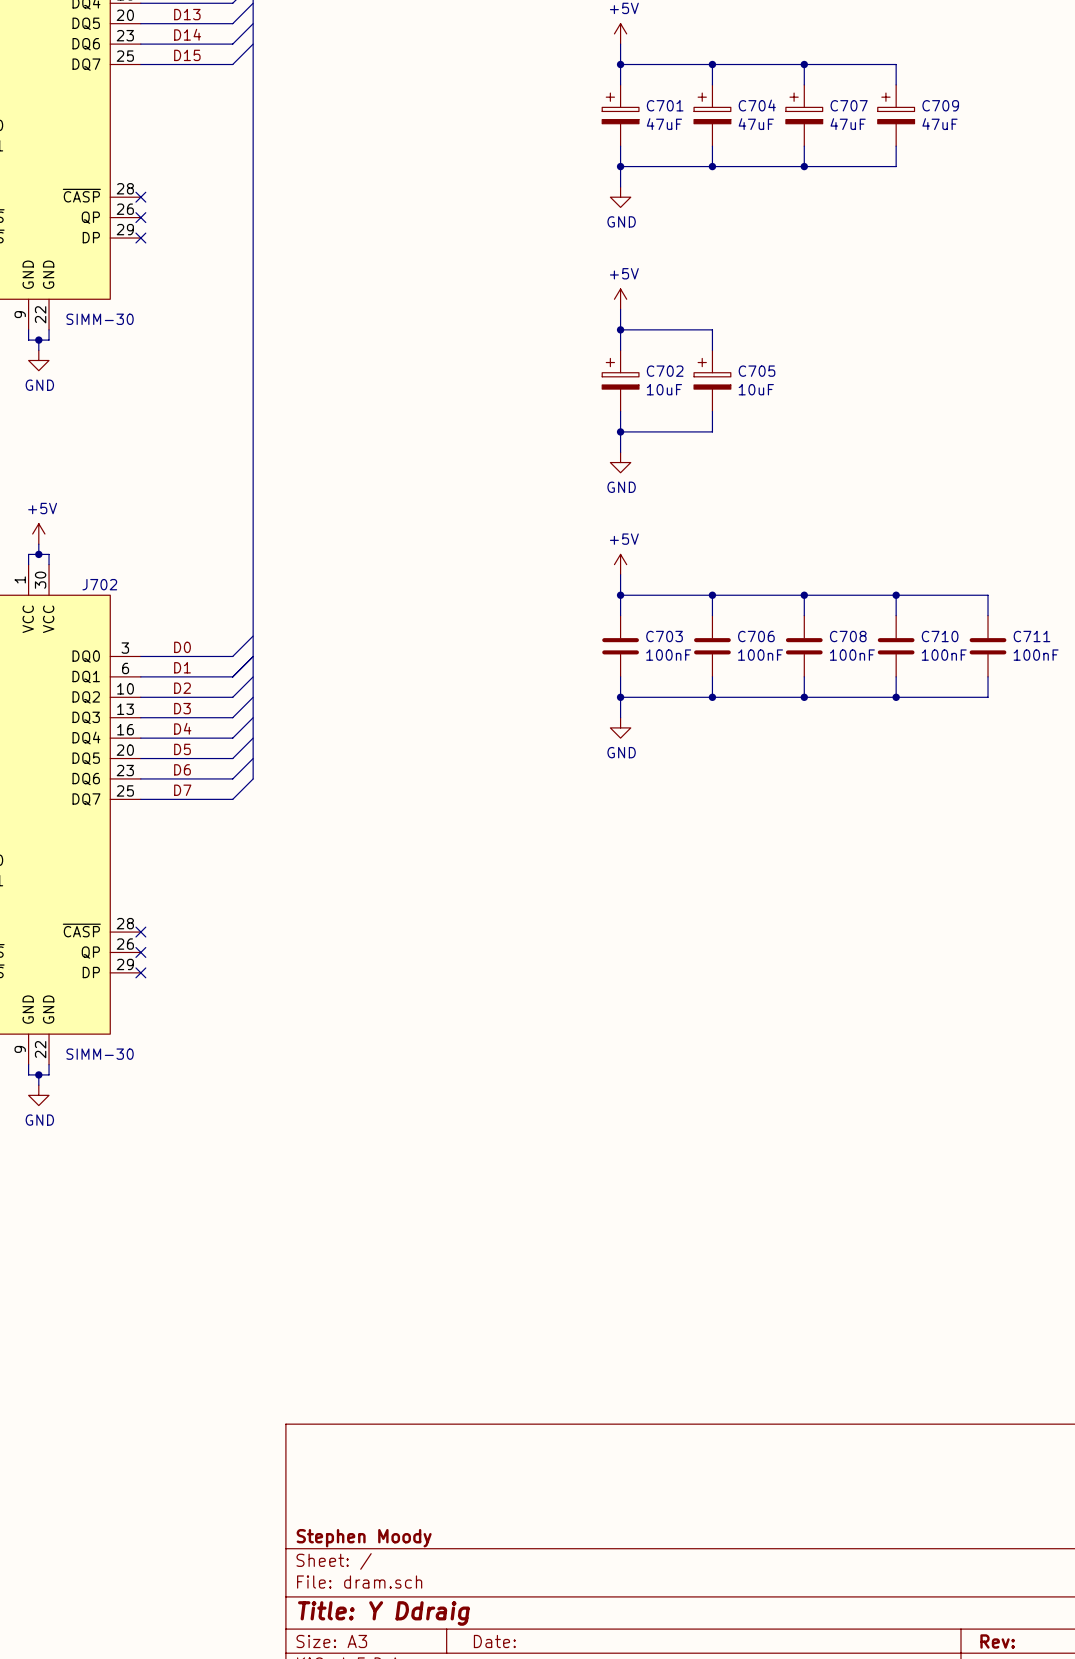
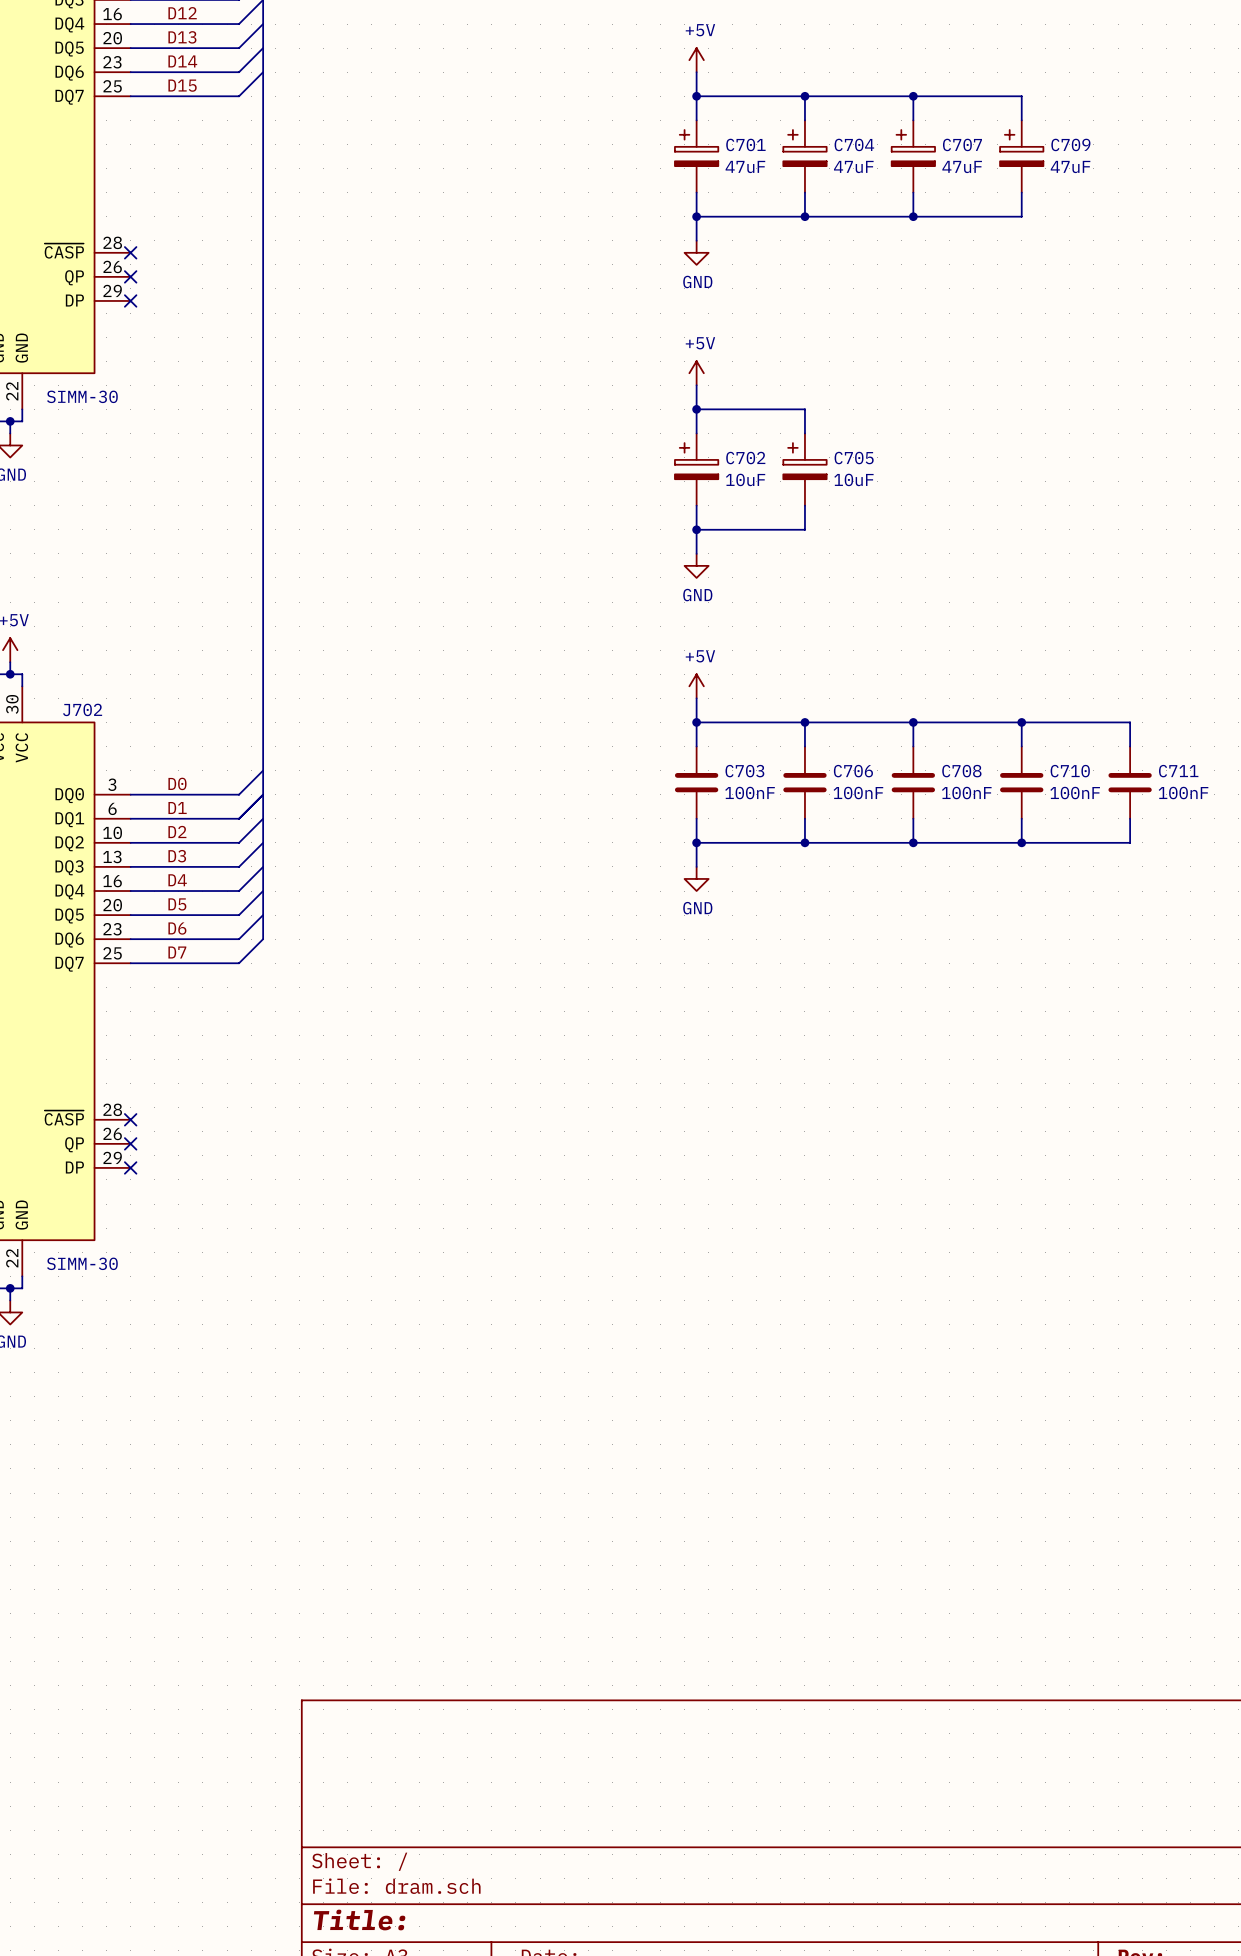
title block: Stephen Moody (364, 1538) -> none
title block: Title: Y Ddraig (383, 1613) -> Title: (359, 1920)

